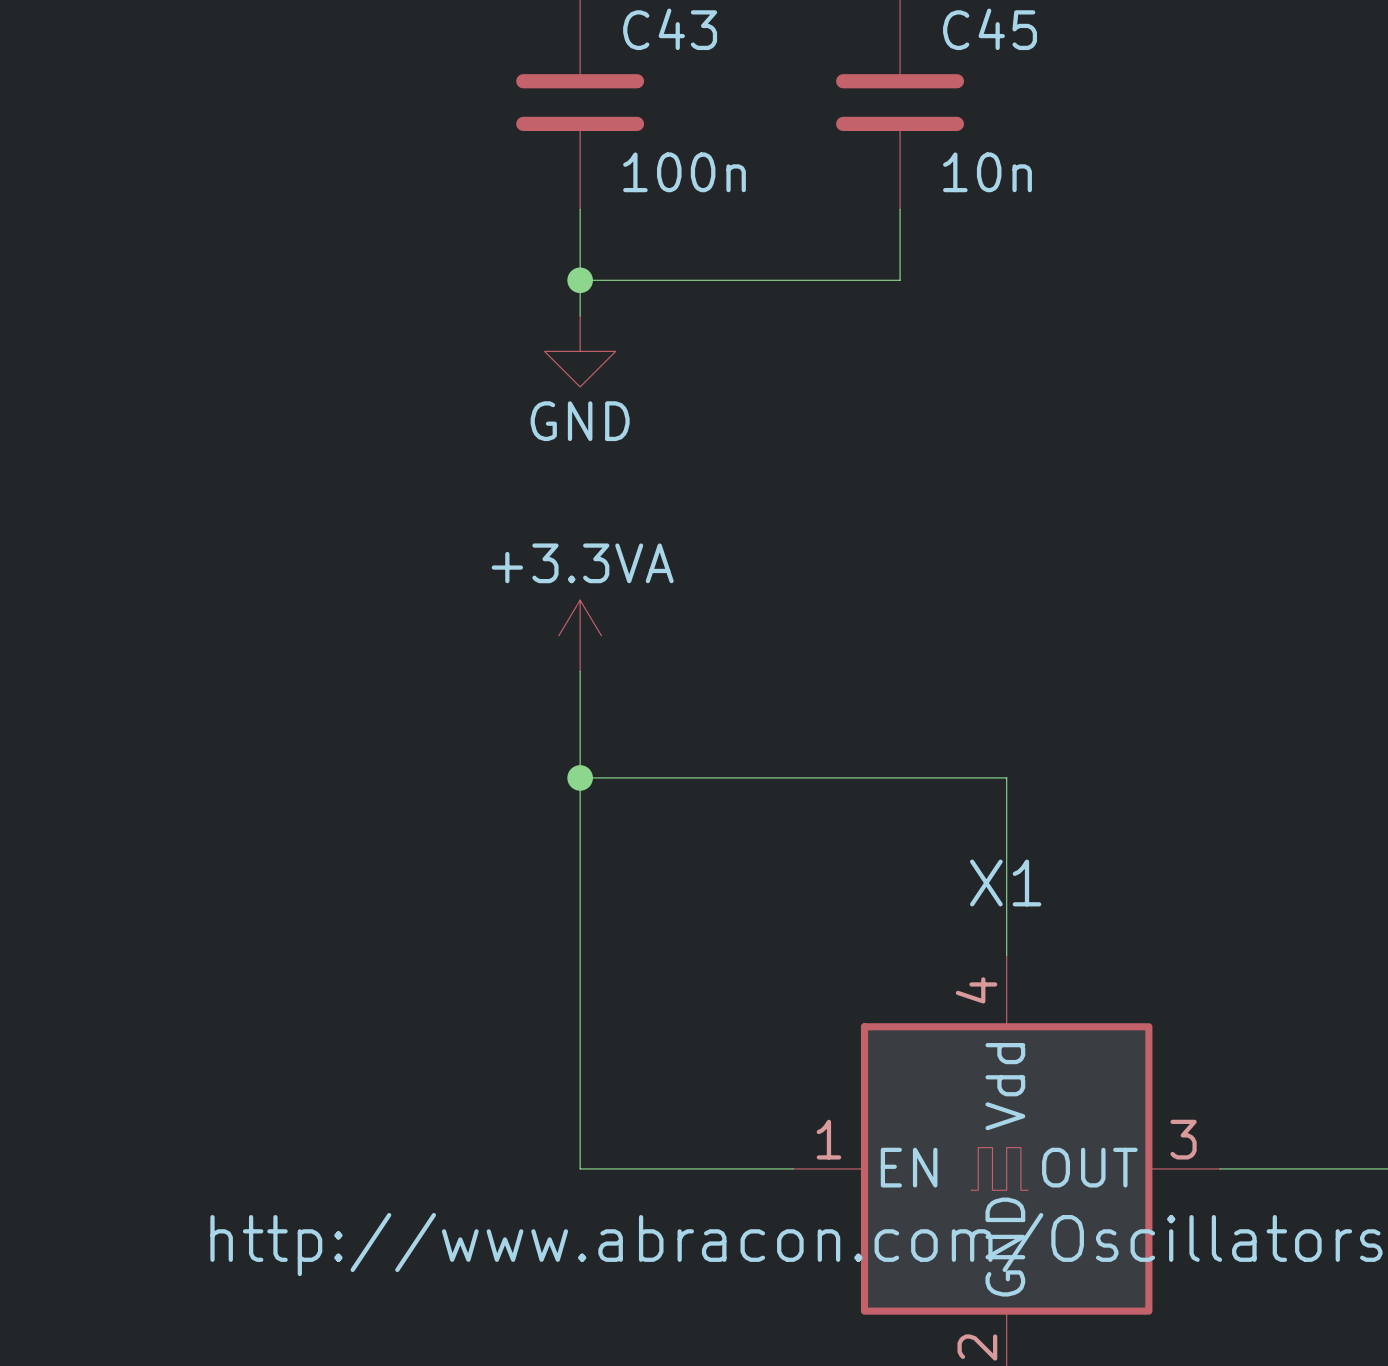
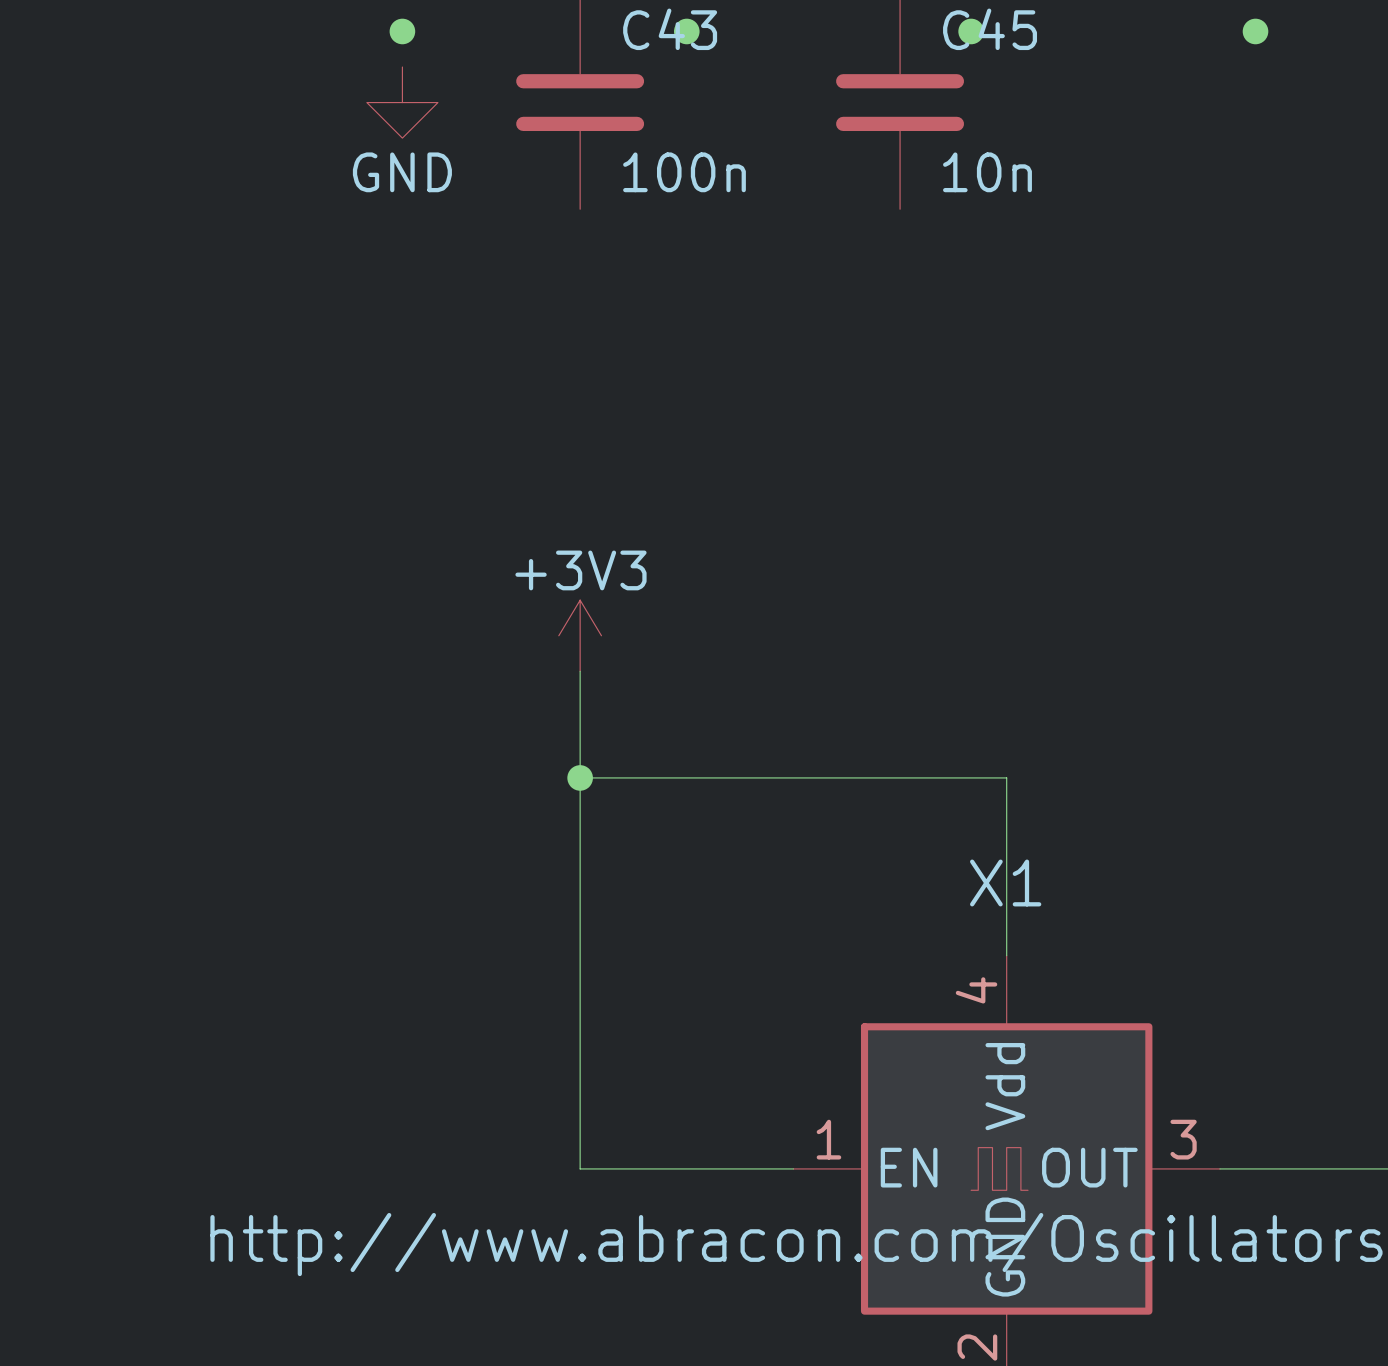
junction: none -> (402, 31)
junction: none -> (686, 31)
junction: none -> (971, 31)
junction: none -> (1255, 31)
wire: (580, 209) (580, 315) -> none
wire: (900, 209) (900, 280) (580, 280) -> none
junction: (580, 280) -> none
power symbol position: GND (580, 351) -> GND (402, 102)
power symbol: +3.3VA (580, 635) -> +3V3 (580, 635)

